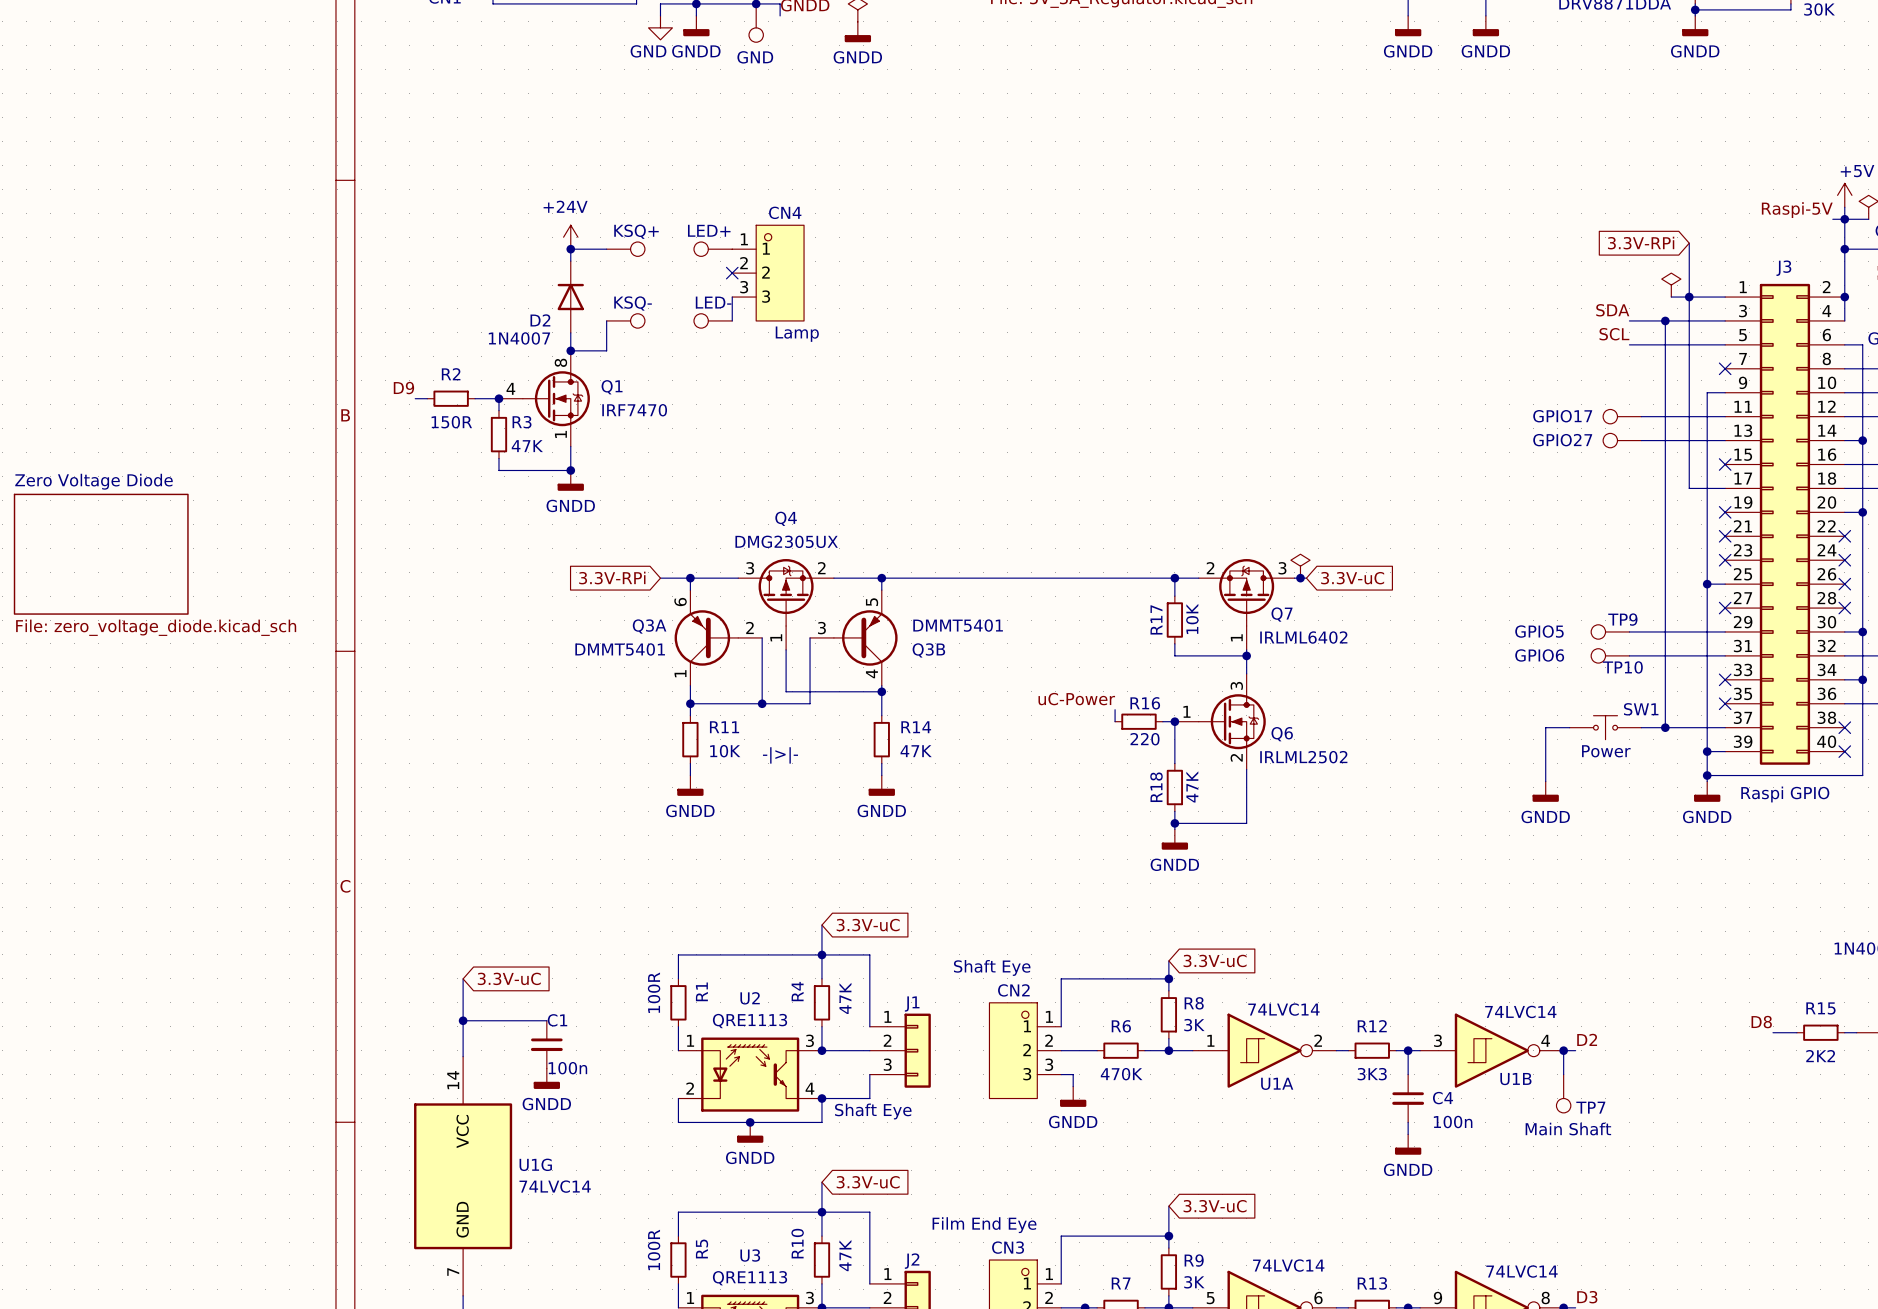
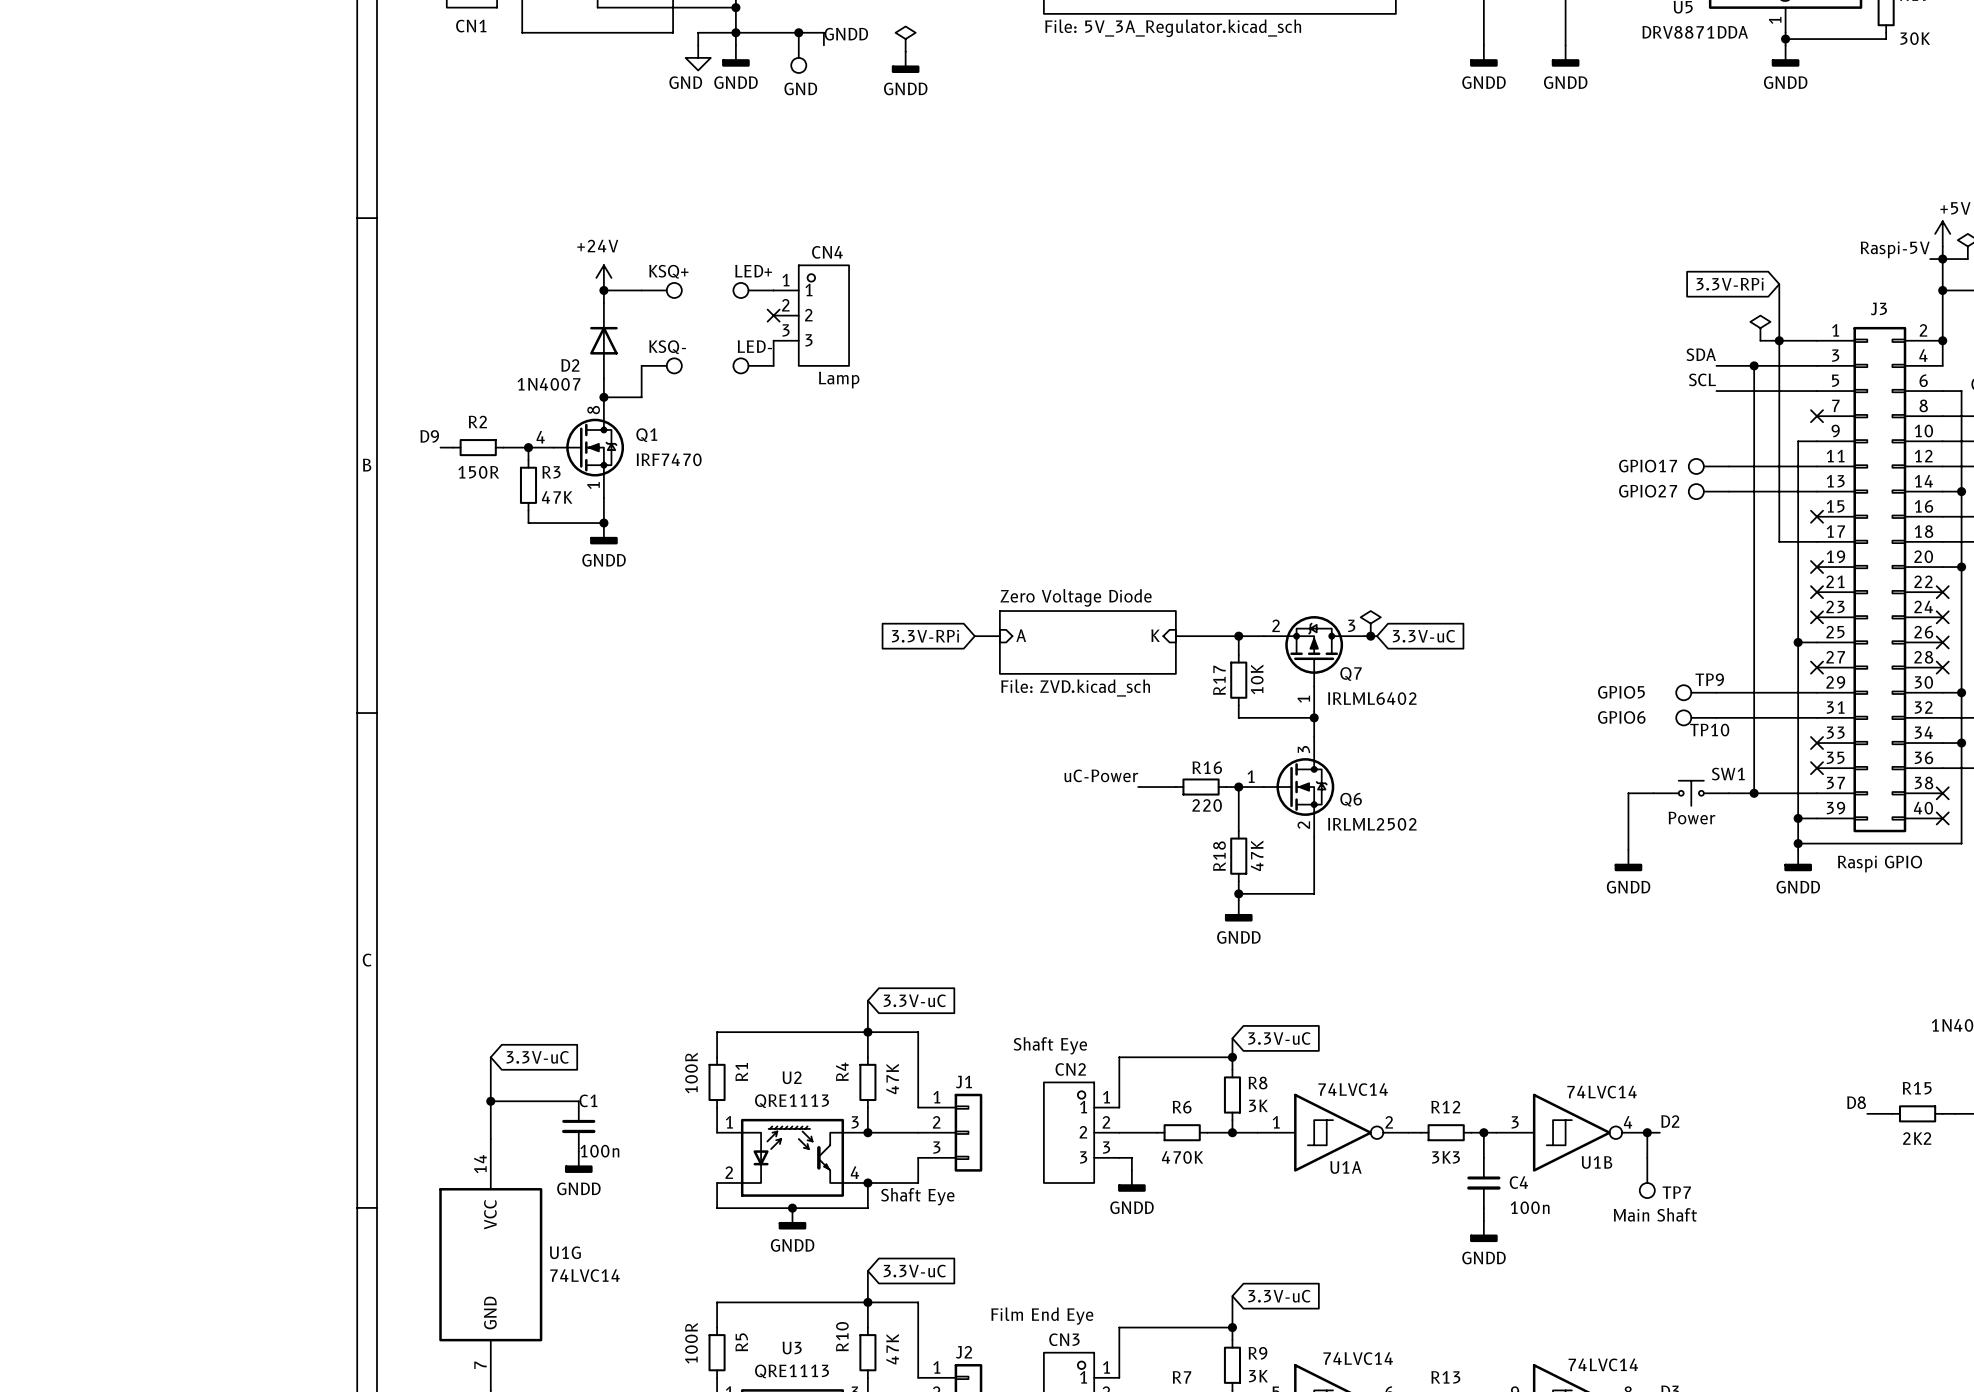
sheet Zero Voltage Diode: File: zero_voltage_diode.kicad_sch (101, 554) -> none
sheet pin: none -> A (1021, 635)
sheet pin: none -> K (1155, 635)
global label: 3.3V-RPi (612, 578) -> none
wire: (660, 578) (738, 578) -> none
wire: (690, 578) (690, 590) -> none
junction: (690, 578) -> none
wire: (833, 578) (923, 578) -> none
global label: none -> 3.3V-RPi (925, 636)
wire: (881, 578) (881, 590) -> none
junction: (881, 578) -> none
wire: (947, 578) (1115, 578) -> none
sheet Zero Voltage Diode: none -> File: ZVD.kicad_sch (1087, 642)
Q4: DMG2305UX (786, 604) -> none
Q3A: DMMT5401 (718, 637) -> none
wire: (762, 637) (762, 703) -> none
wire: (810, 637) (810, 703) (690, 703) -> none
Q3B: DMMT5401 (853, 637) -> none
wire: (786, 649) (786, 691) (881, 691) -> none
wire: (690, 685) (690, 715) -> none
wire: (881, 685) (881, 715) -> none
junction: (881, 691) -> none
label position: uC-Power (1076, 699) -> uC-Power (1101, 775)
junction: (690, 703) -> none
junction: (762, 703) -> none
wire: (1115, 709) (1115, 721) -> (1138, 787) (1175, 787)
R11: 10K (690, 739) -> none
R14: 47K (881, 739) -> none
text: -|>|- (780, 755) -> none
wire: (690, 763) (690, 775) -> none
wire: (881, 763) (881, 775) -> none
power symbol: GNDD (690, 785) -> none
power symbol: GNDD (881, 785) -> none

